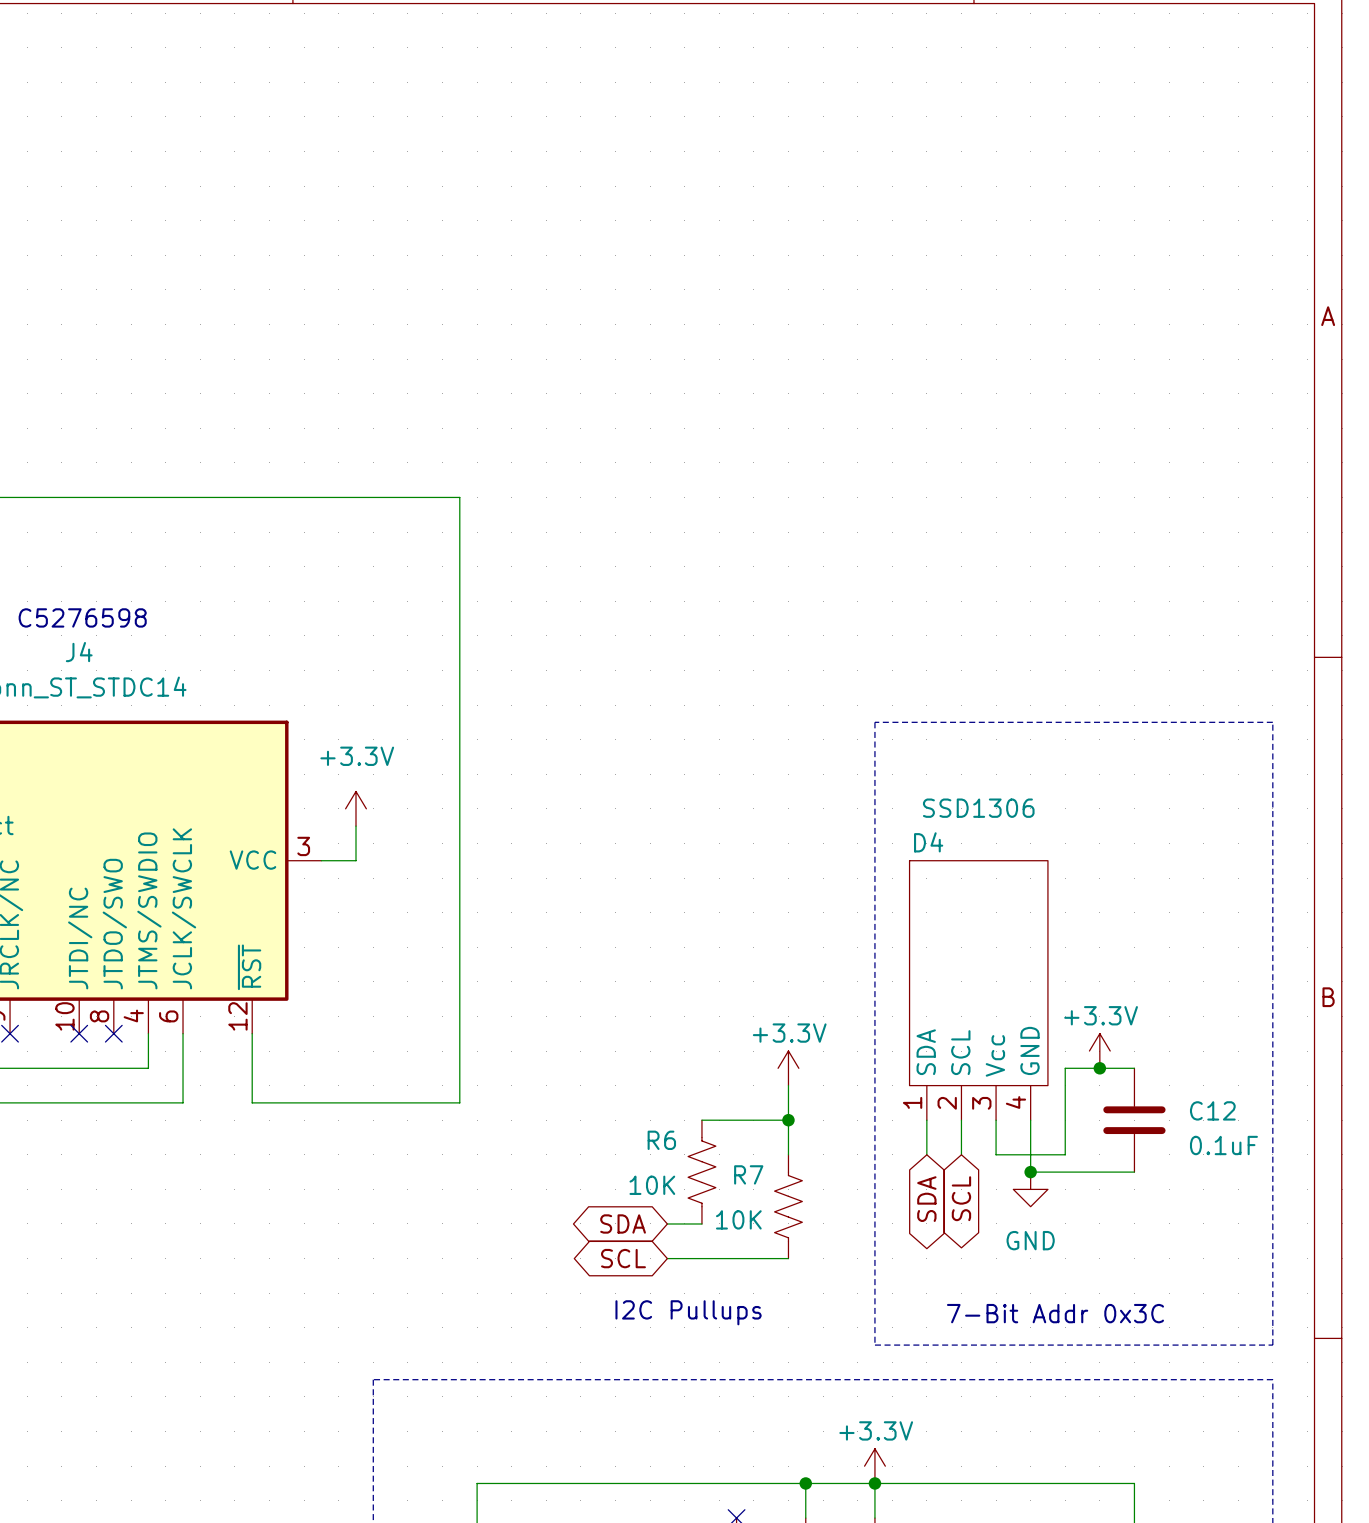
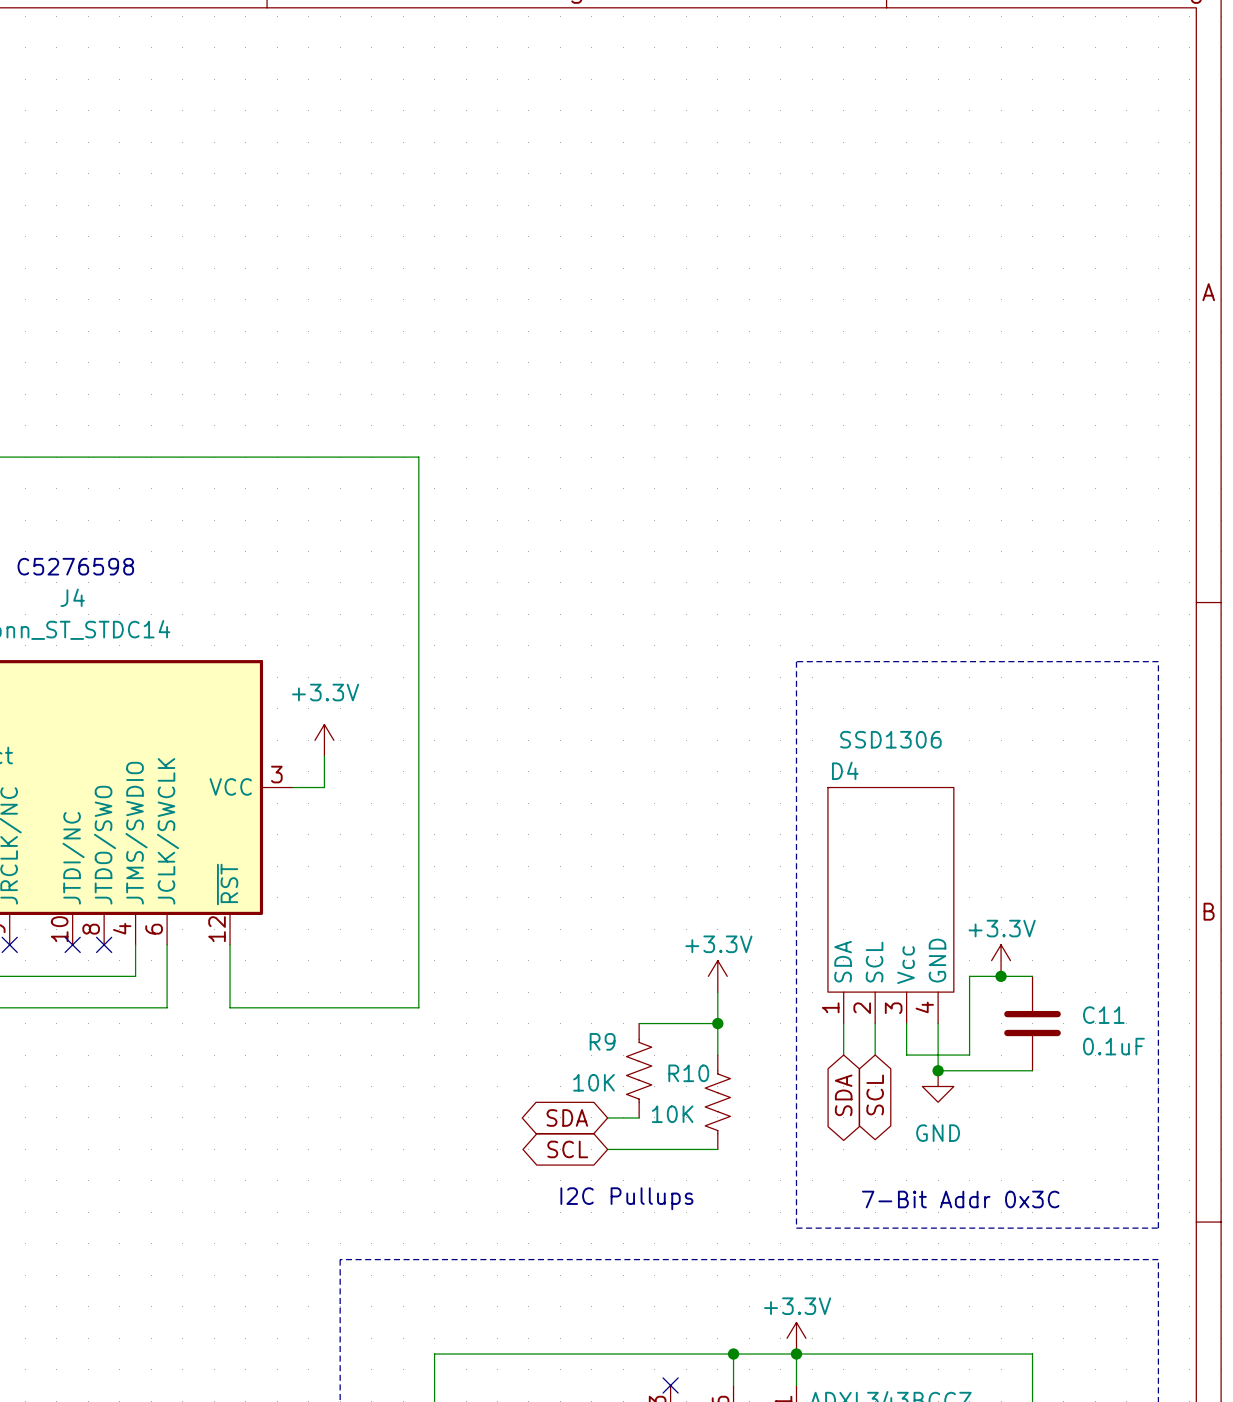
C12 name: C12 (1212, 1110) -> C11 (1103, 1015)
R6 name: R6 (661, 1140) -> R9 (602, 1041)
R7 name: R7 (748, 1174) -> R10 (688, 1073)

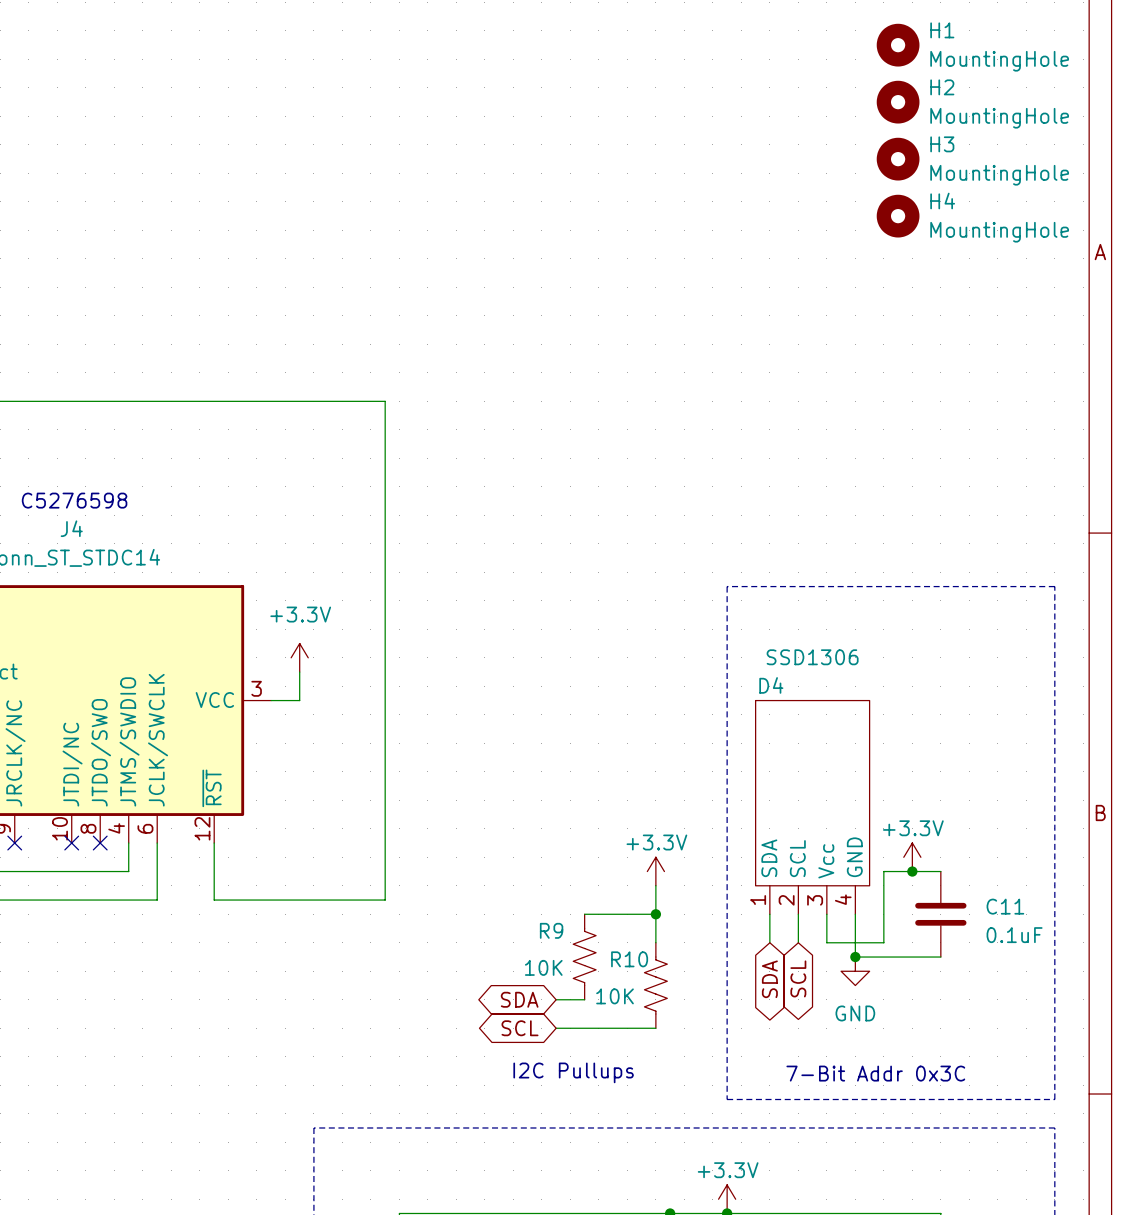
H1: none -> MountingHole (898, 45)
H2: none -> MountingHole (898, 102)
H3: none -> MountingHole (898, 159)
H4: none -> MountingHole (898, 216)

